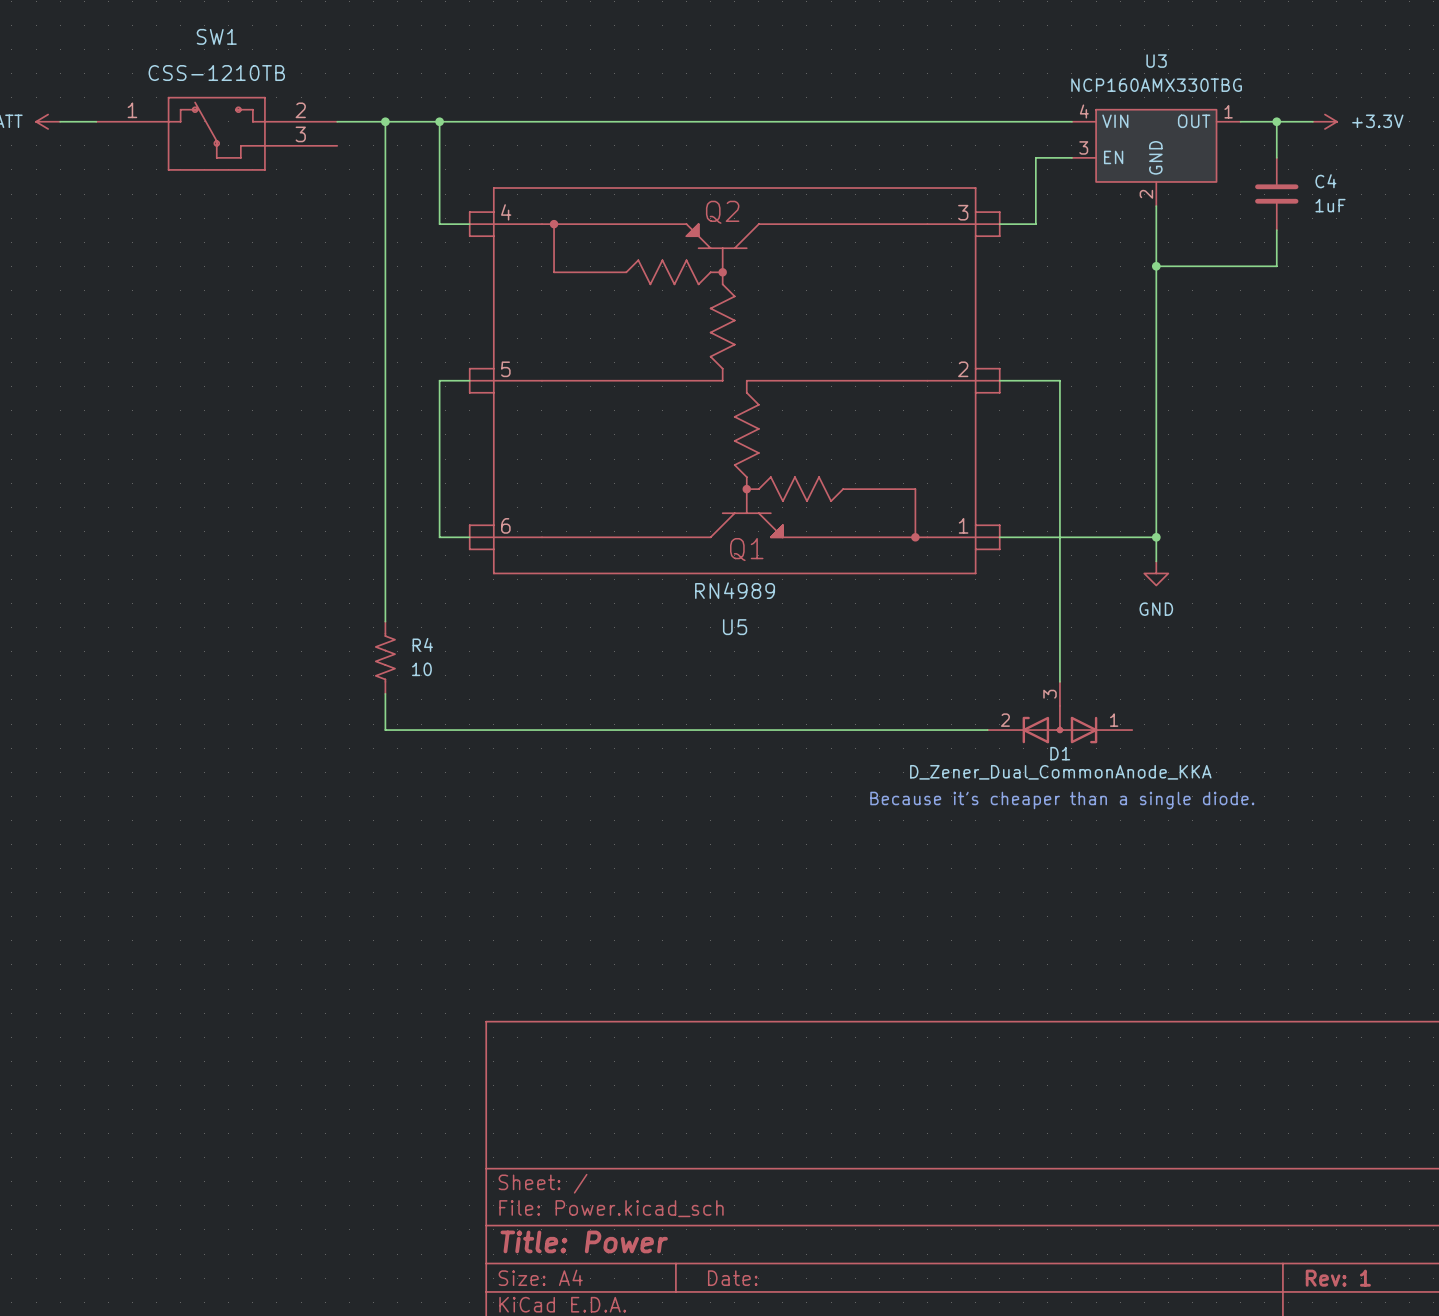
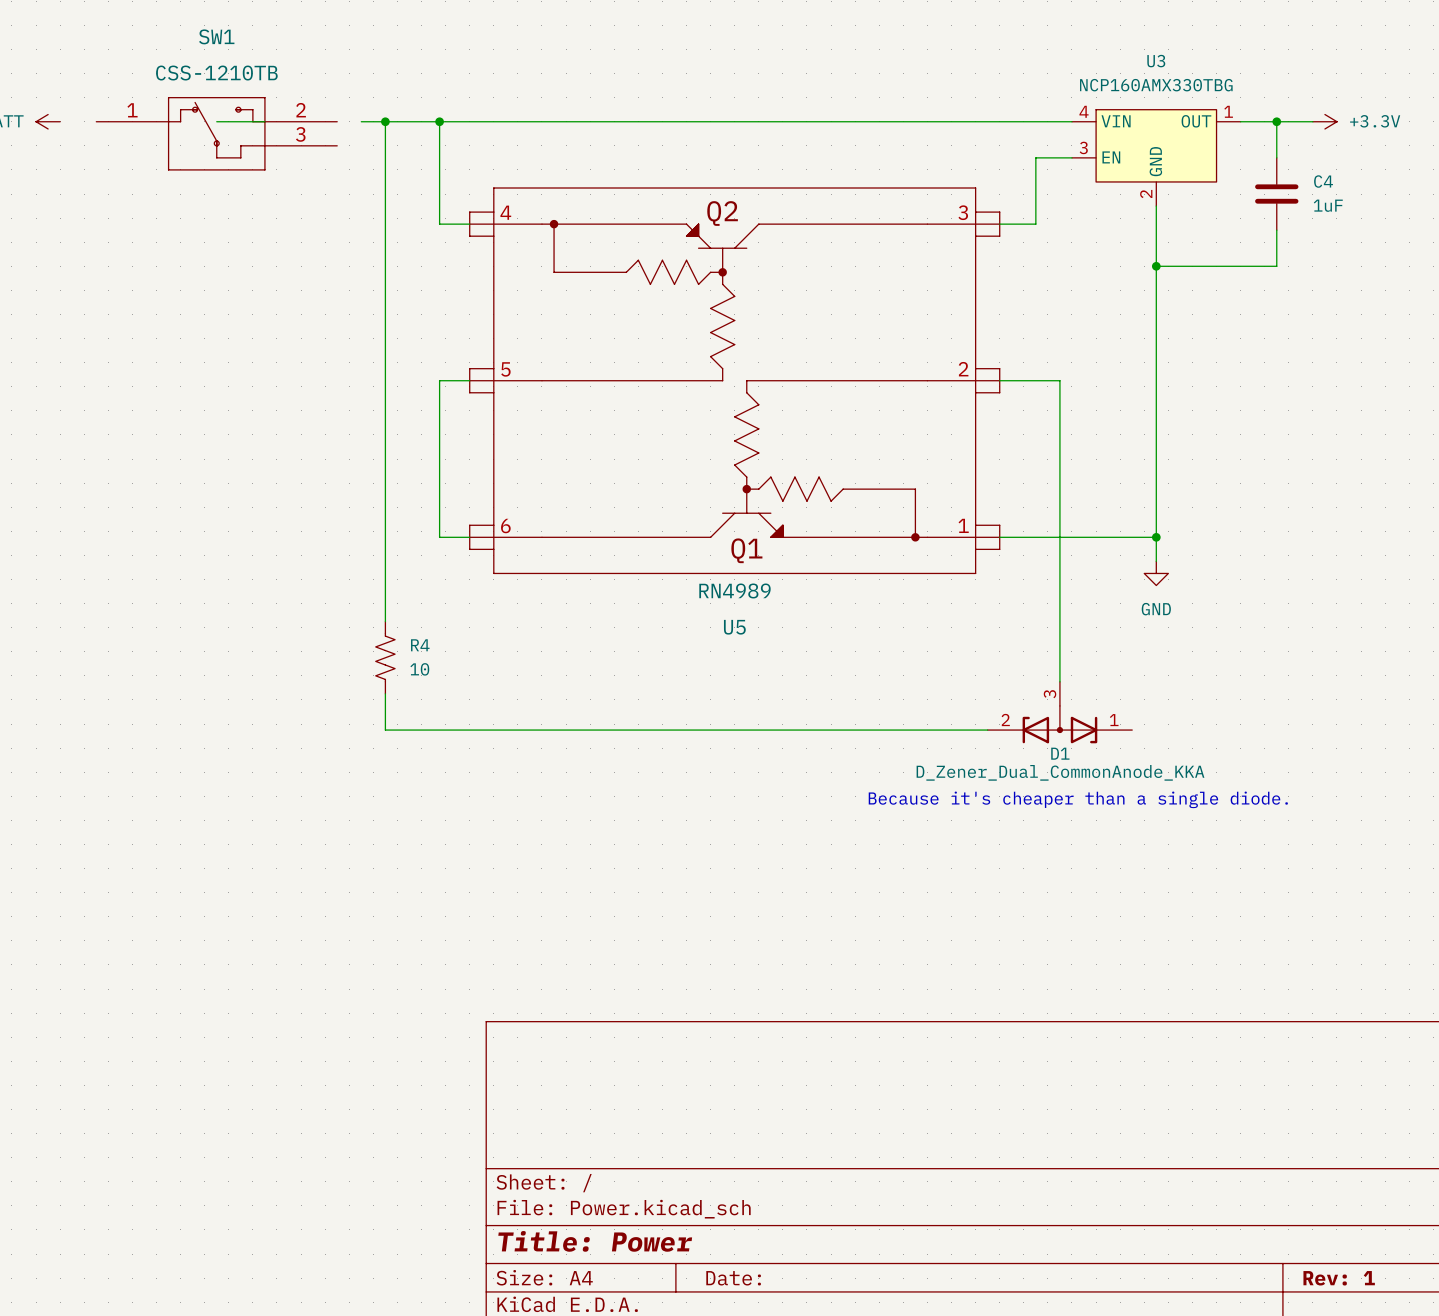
wire: (60, 121) (96, 121) -> none
wire: none -> (216, 121) (264, 121)
wire: (337, 121) (361, 121) -> none

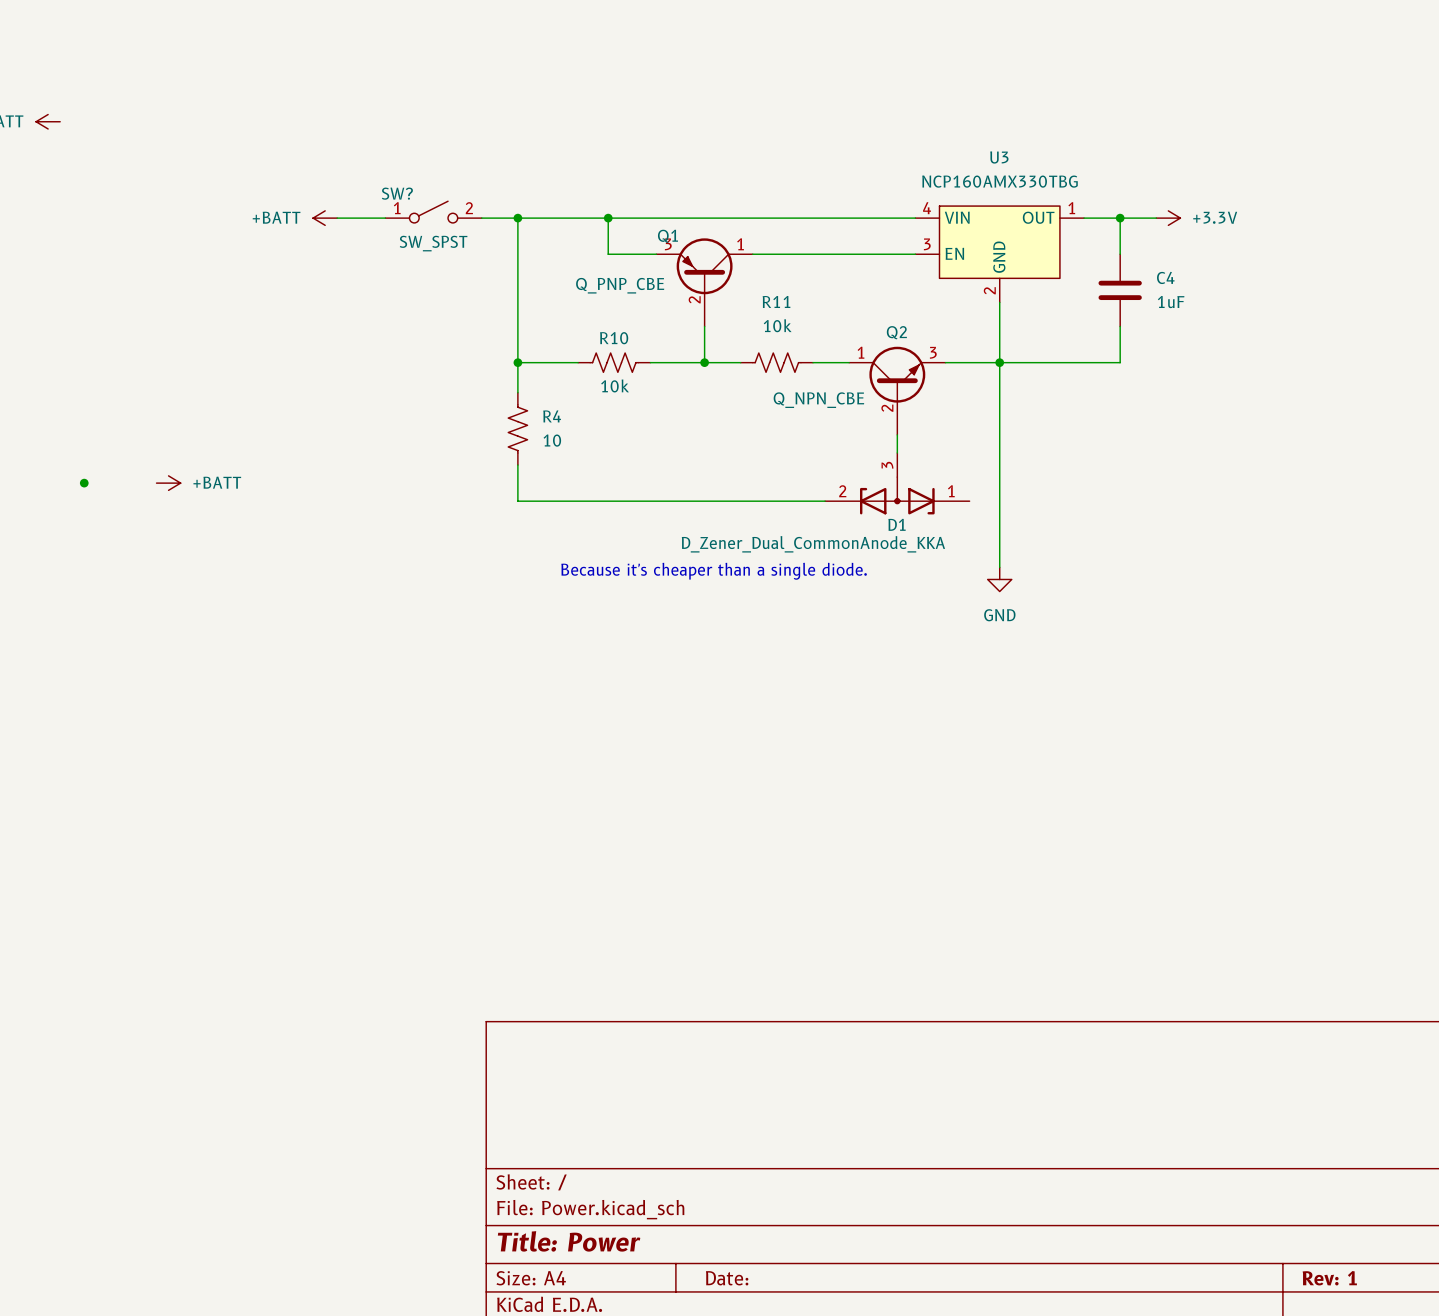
wire: (216, 121) (264, 121) -> (337, 218) (385, 218)
wire: (361, 121) (1071, 121) -> none
wire: (385, 121) (385, 621) -> none
junction: (385, 121) -> none
wire: (439, 121) (439, 224) (469, 224) -> none
junction: (439, 121) -> none
wire: (1240, 121) (1312, 121) -> (1084, 218) (1156, 218)
wire: (1276, 121) (1276, 157) -> (1120, 218) (1120, 254)
junction: (1276, 121) -> none
power symbol position: +3.3V (1324, 121) -> +3.3V (1168, 218)
SW1: CSS-1210TB (216, 133) -> none
wire: (1071, 157) (1035, 157) (1035, 224) (999, 224) -> none
U3 position: (1156, 157) -> (999, 254)
C4 position: (1276, 194) -> (1120, 290)
wire: (1156, 206) (1156, 561) -> none
SW?: none -> SW_SPST (433, 212)
power symbol: none -> +BATT (325, 218)
wire: none -> (481, 218) (915, 218)
wire: none -> (517, 218) (517, 392)
junction: none -> (517, 218)
wire: none -> (608, 218) (608, 254) (656, 254)
junction: none -> (608, 218)
junction: none -> (1120, 218)
wire: (1276, 230) (1276, 266) (1156, 266) -> none
wire: none -> (752, 254) (915, 254)
junction: (1156, 266) -> none
Q1: none -> Q_PNP_CBE (704, 282)
wire: none -> (999, 302) (999, 567)
wire: none -> (704, 326) (704, 362)
wire: none -> (1120, 326) (1120, 362) (945, 362)
wire: none -> (517, 362) (578, 362)
junction: none -> (517, 362)
R10: none -> 10k (614, 362)
wire: none -> (650, 362) (740, 362)
junction: none -> (704, 362)
R11: none -> 10k (776, 362)
wire: none -> (813, 362) (849, 362)
junction: none -> (999, 362)
wire: (469, 380) (439, 380) (439, 537) (469, 537) -> none
U5: RN4989 (734, 380) -> none
wire: (999, 380) (1059, 380) (1059, 681) -> none
Q2: none -> Q_NPN_CBE (897, 390)
wire: none -> (897, 434) (897, 453)
wire: none -> (517, 465) (517, 501) (825, 501)
junction: none -> (84, 483)
power symbol: none -> +BATT (168, 483)
wire: (999, 537) (1156, 537) -> none
junction: (1156, 537) -> none
text: none -> Because it's cheaper than a single diode. (714, 571)
power symbol position: GND (1156, 573) -> GND (999, 579)
R4 position: (385, 657) -> (517, 428)
wire: (385, 693) (385, 730) (987, 730) -> none
D1 position: (1059, 712) -> (897, 483)
D1 value position: D_Zener_Dual_CommonAnode_KKA (1060, 772) -> D_Zener_Dual_CommonAnode_KKA (813, 544)
text: Because it's cheaper than a single diode. (1078, 799) -> none

